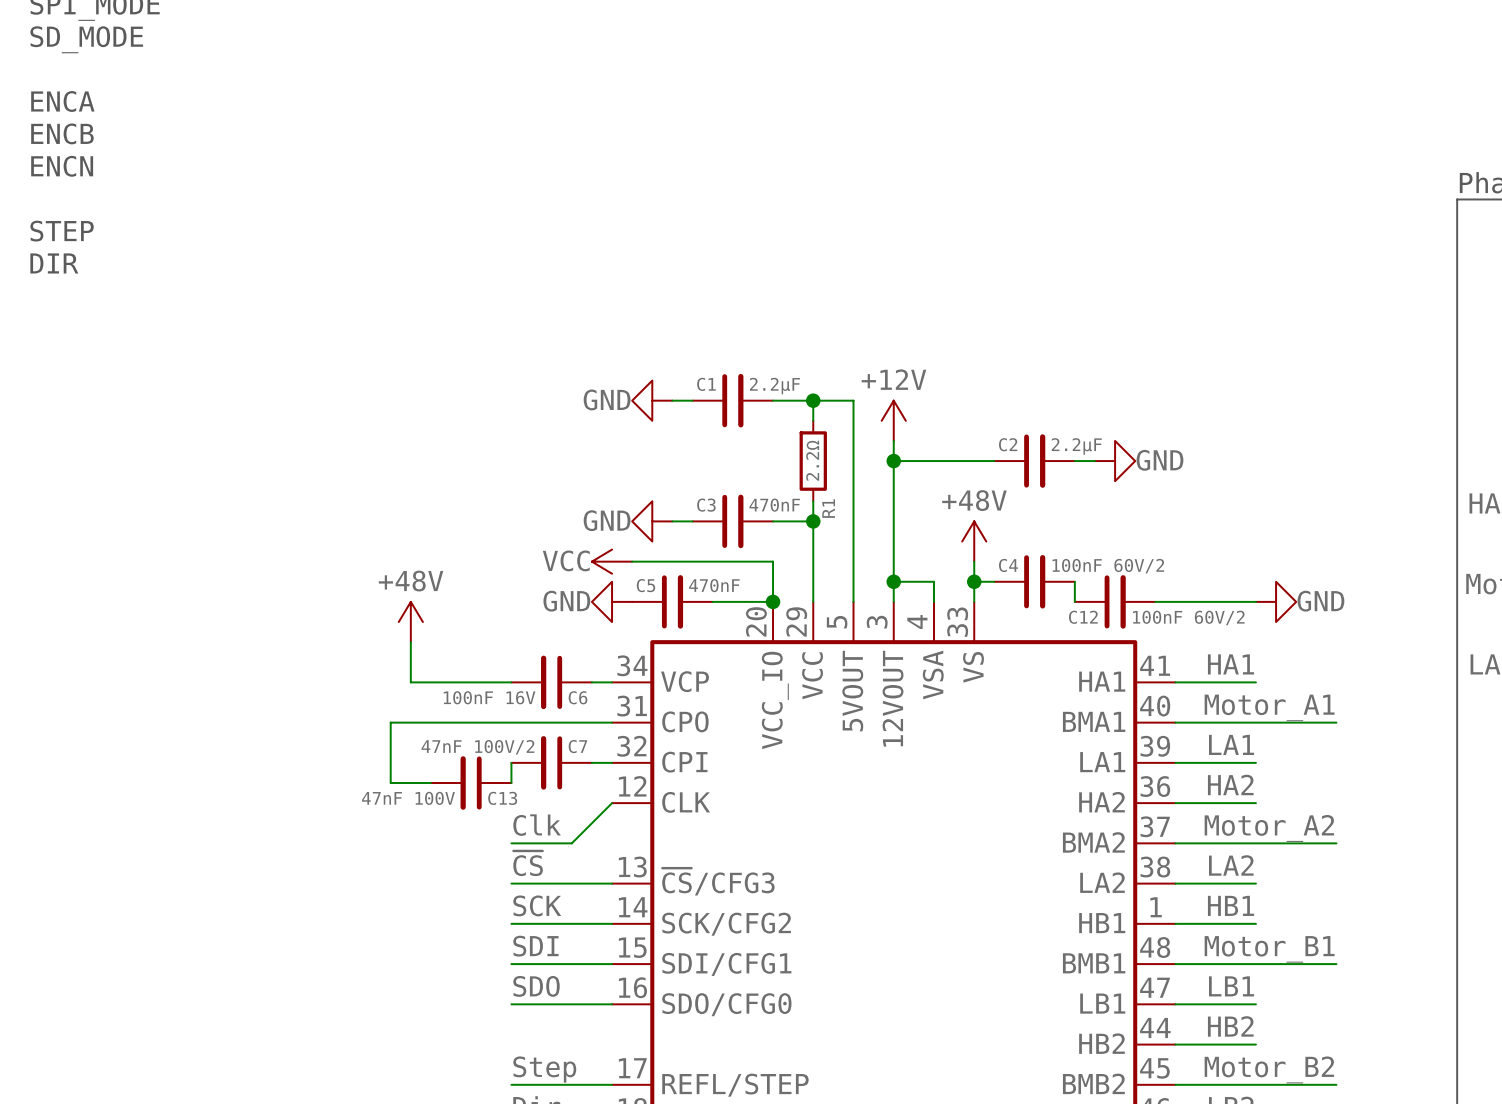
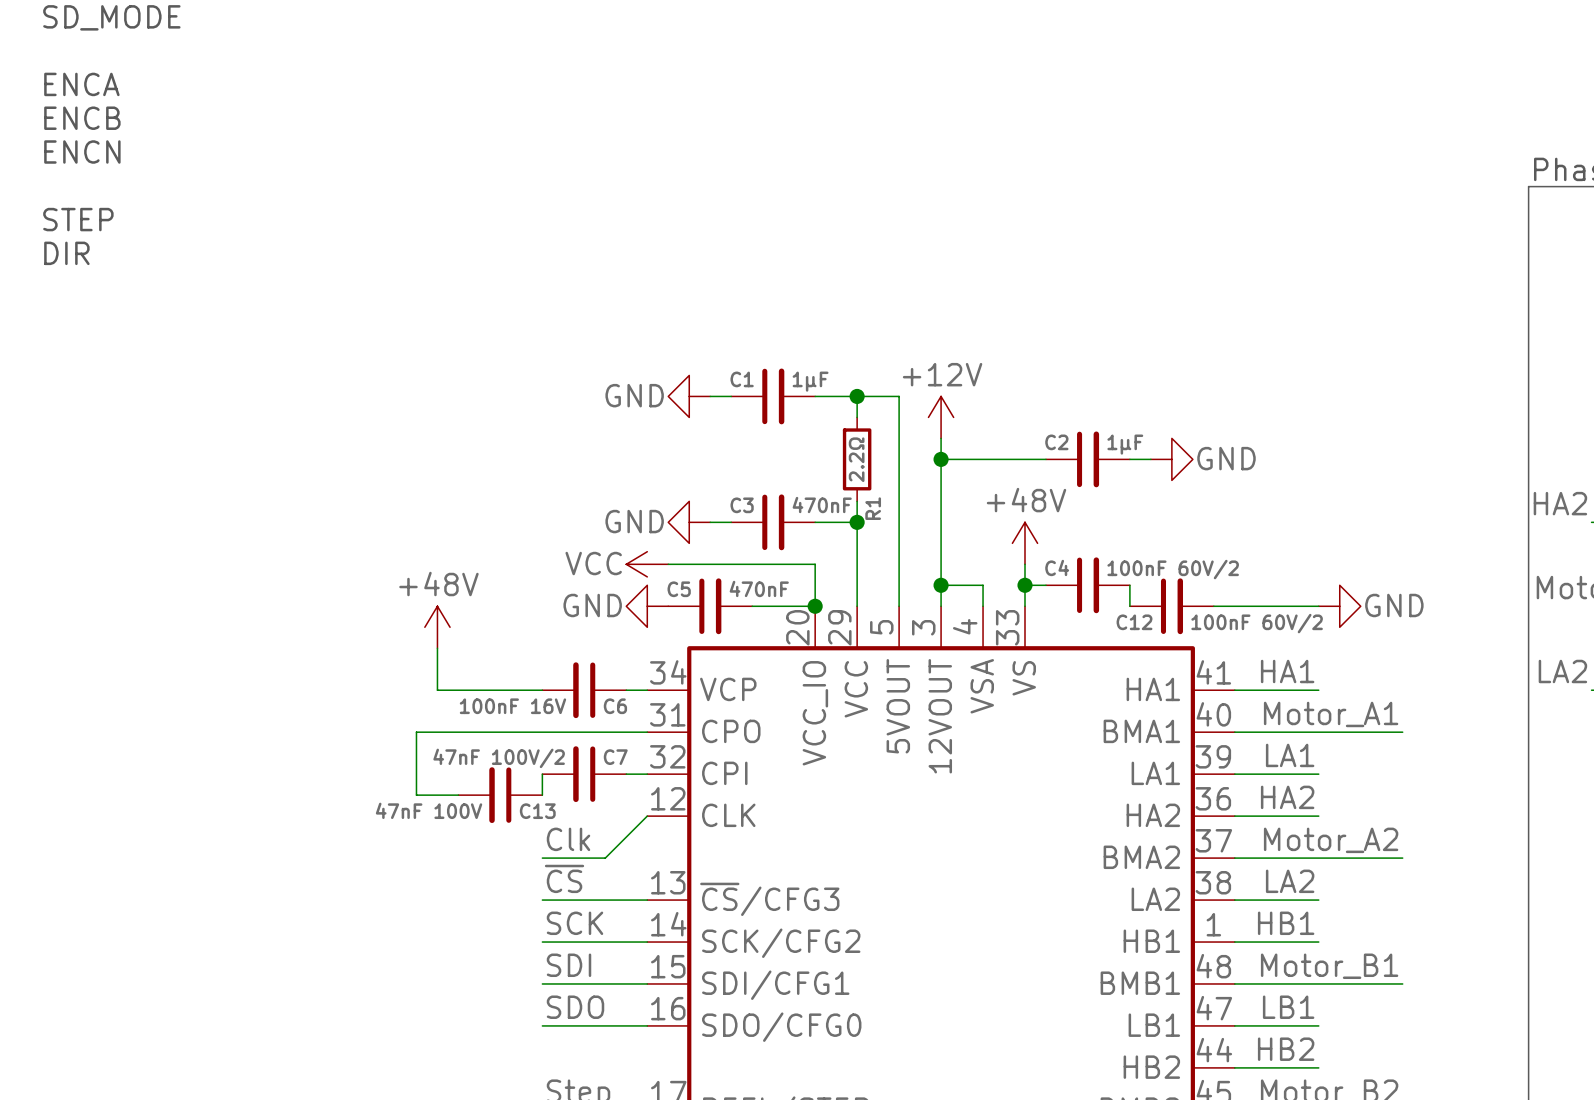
C1 value: 2.2μF (774, 386) -> 1μF (810, 381)
C2 value: 2.2μF (1076, 446) -> 1μF (1125, 444)

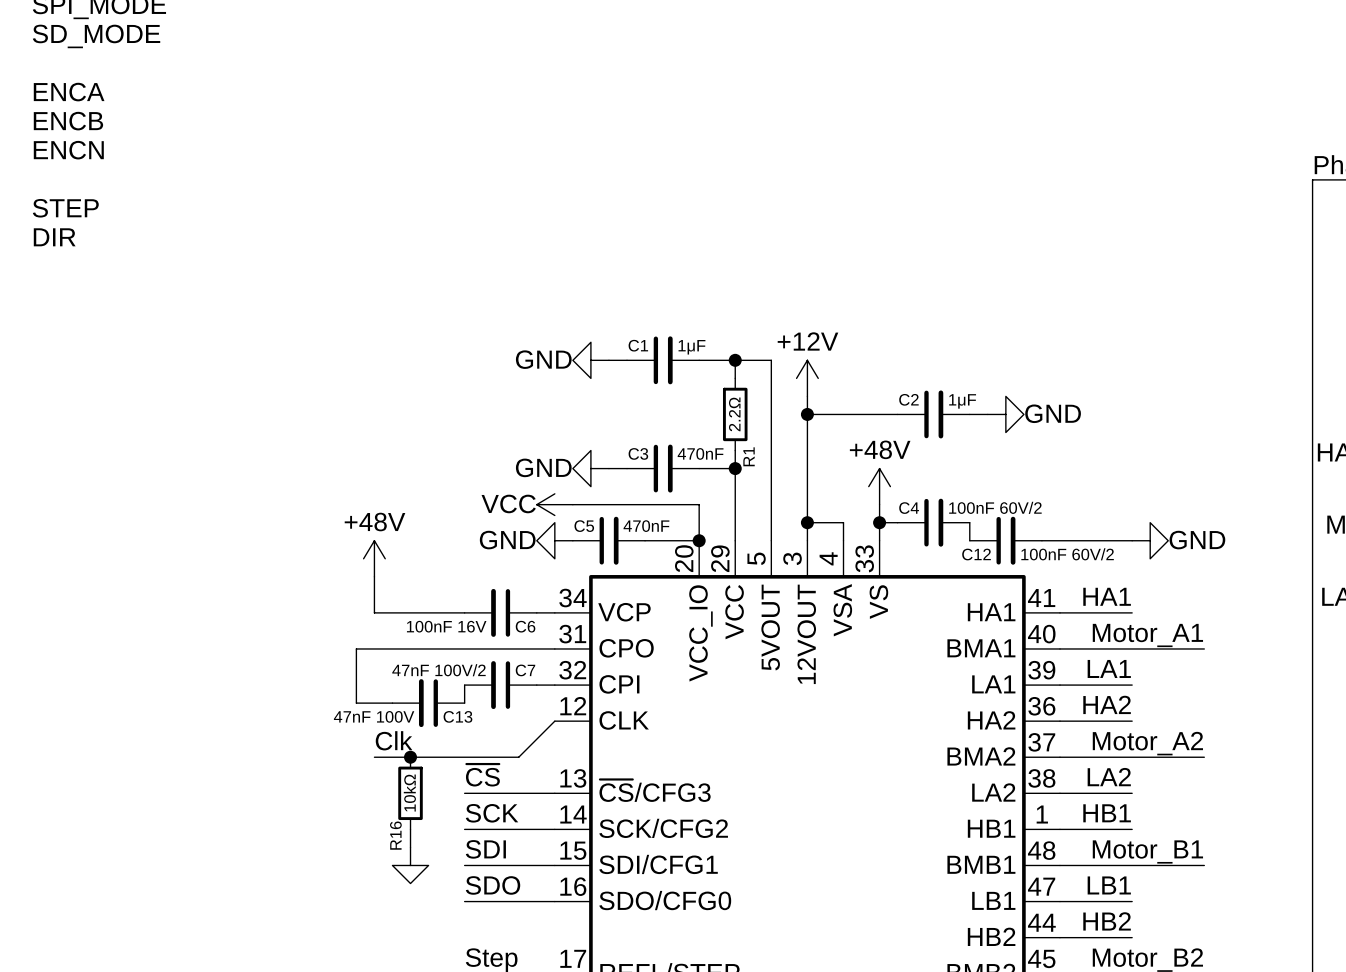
label position: Clk (568, 839) -> Clk (394, 740)
wire: none -> (374, 757) (464, 757)
junction: none -> (410, 757)
R16: none -> 10kΩ (410, 793)
wire: none -> (410, 829) (410, 847)
power symbol: none -> (410, 865)

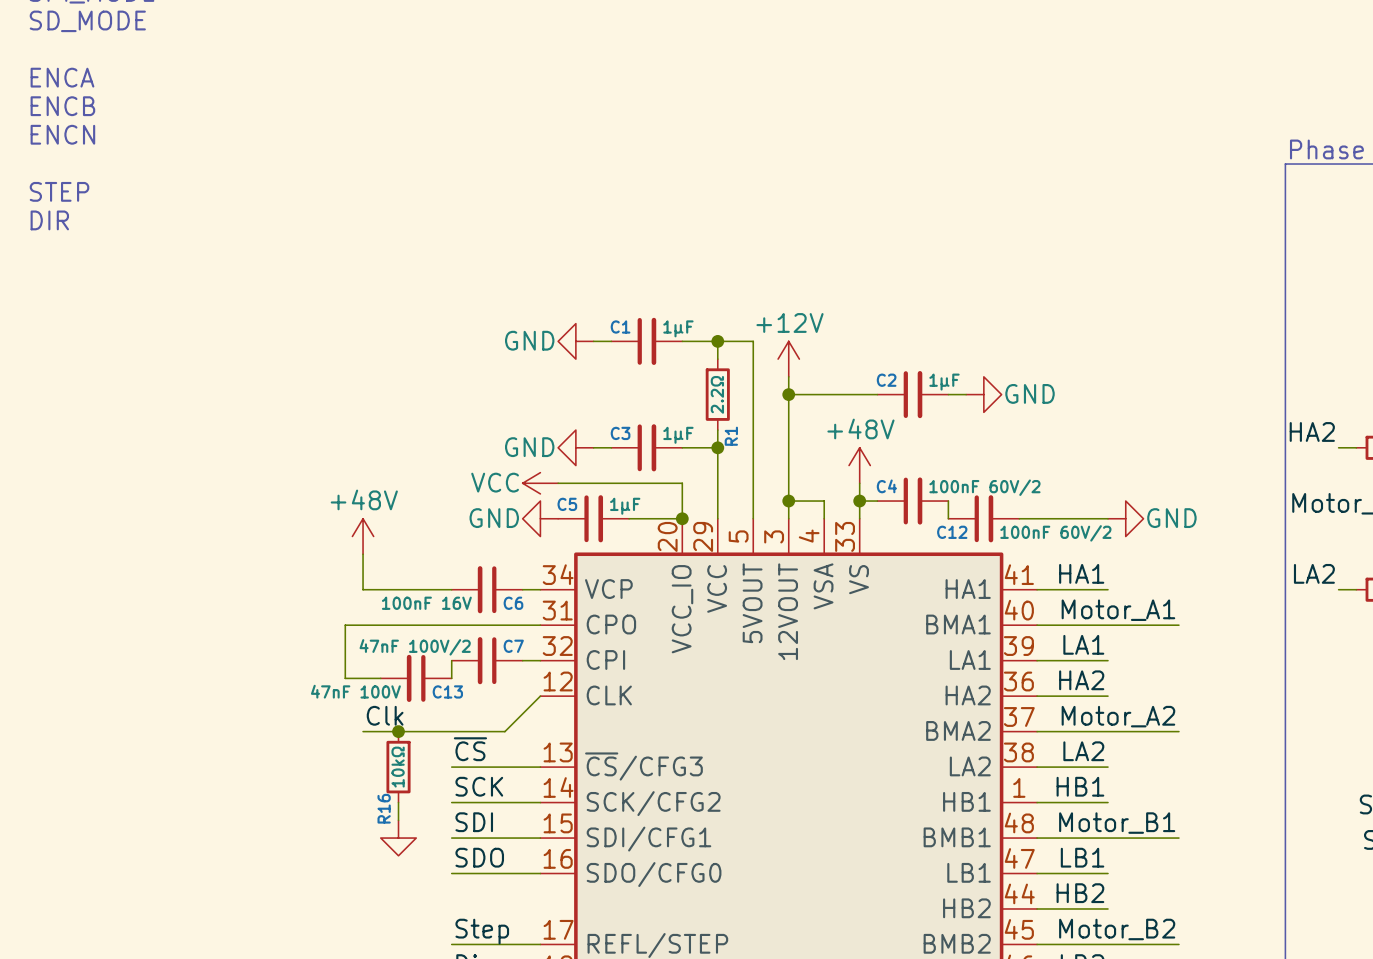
C3 value: 470nF (700, 453) -> 1µF (678, 435)
C5 value: 470nF (646, 526) -> 1µF (625, 506)

